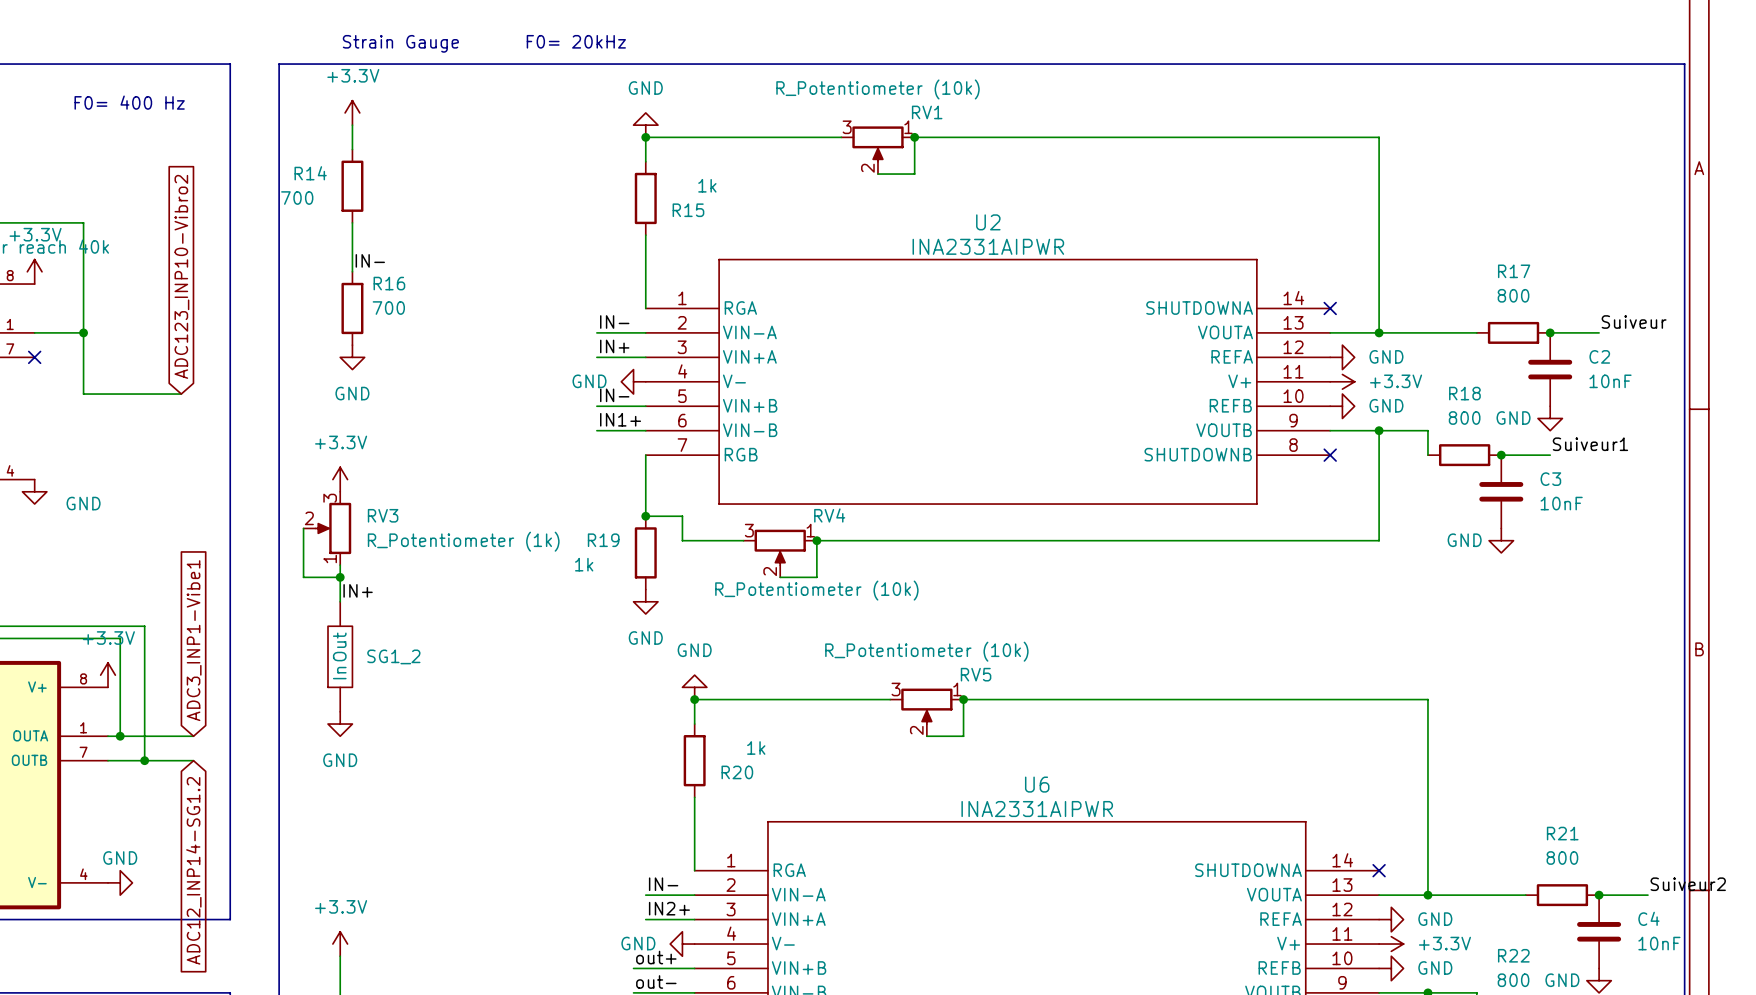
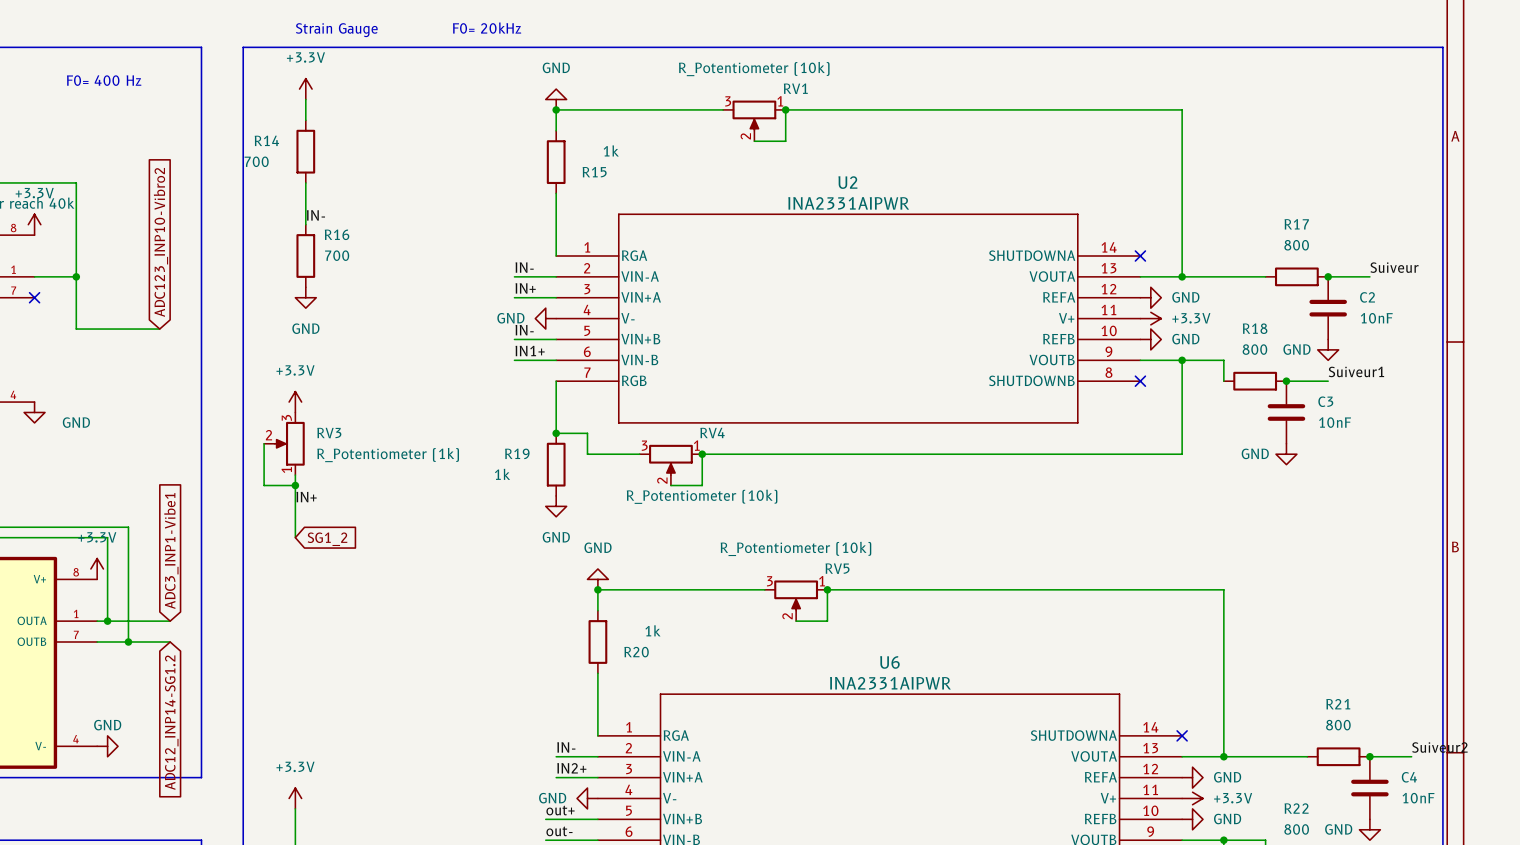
global label: none -> SG1_2 (327, 539)
SG1_2: (340, 656) -> none
power symbol: GND (340, 724) -> none

